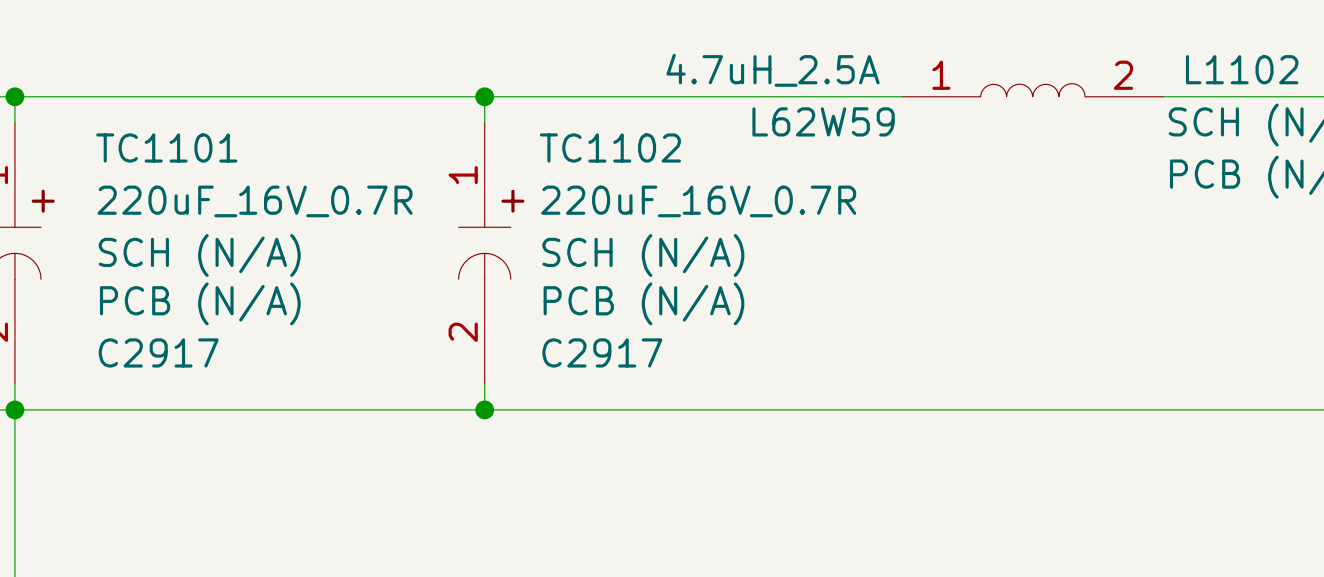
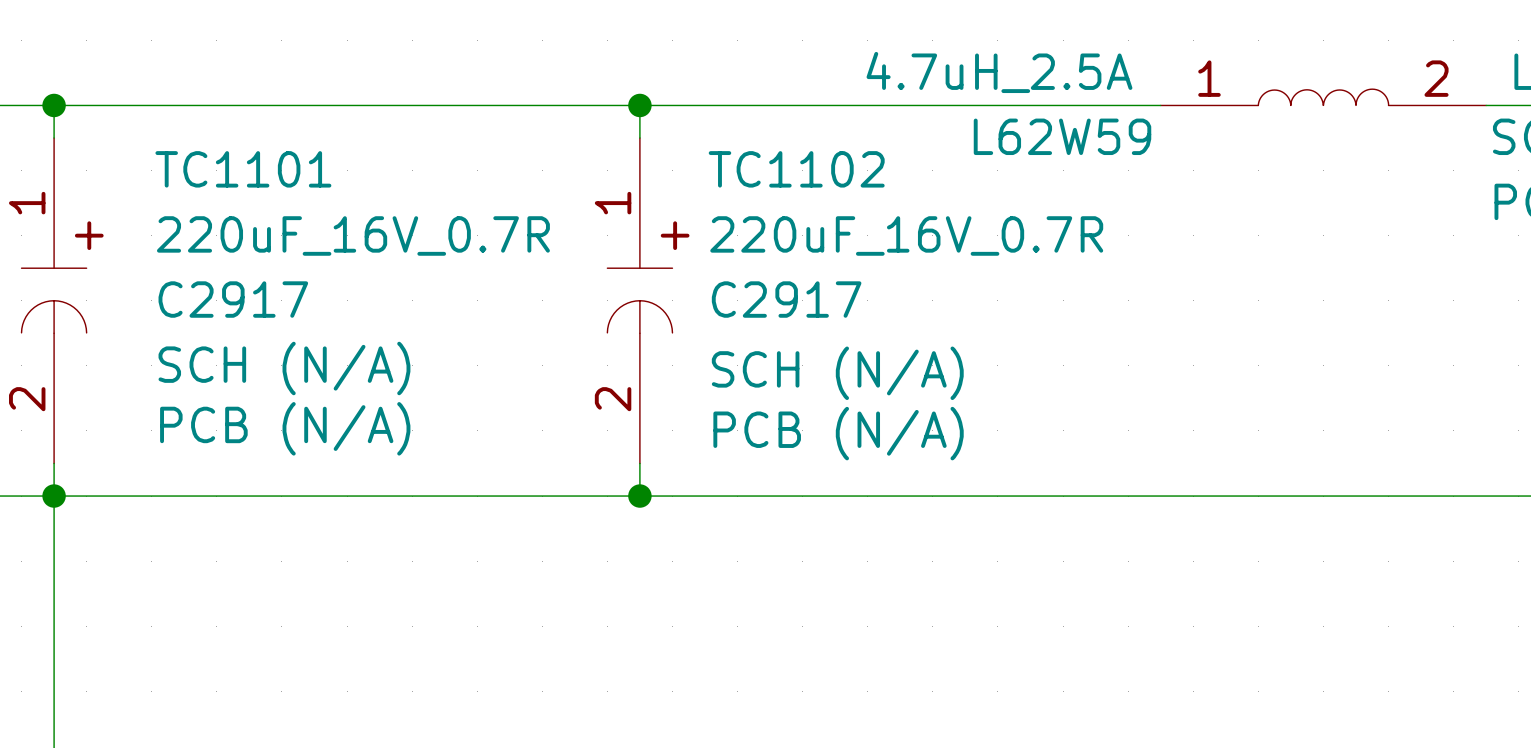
TC1101 text position: SCH (N/A) (199, 255) -> SCH (N/A) (284, 368)
TC1102 text position: SCH (N/A) (643, 255) -> SCH (N/A) (837, 373)
TC1101 text position: PCB (N/A) (200, 303) -> PCB (N/A) (285, 428)
TC1102 text position: PCB (N/A) (643, 303) -> PCB (N/A) (838, 433)
TC1101 text position: C2917 (158, 352) -> C2917 (233, 299)
TC1102 text position: C2917 (602, 352) -> C2917 (786, 299)

